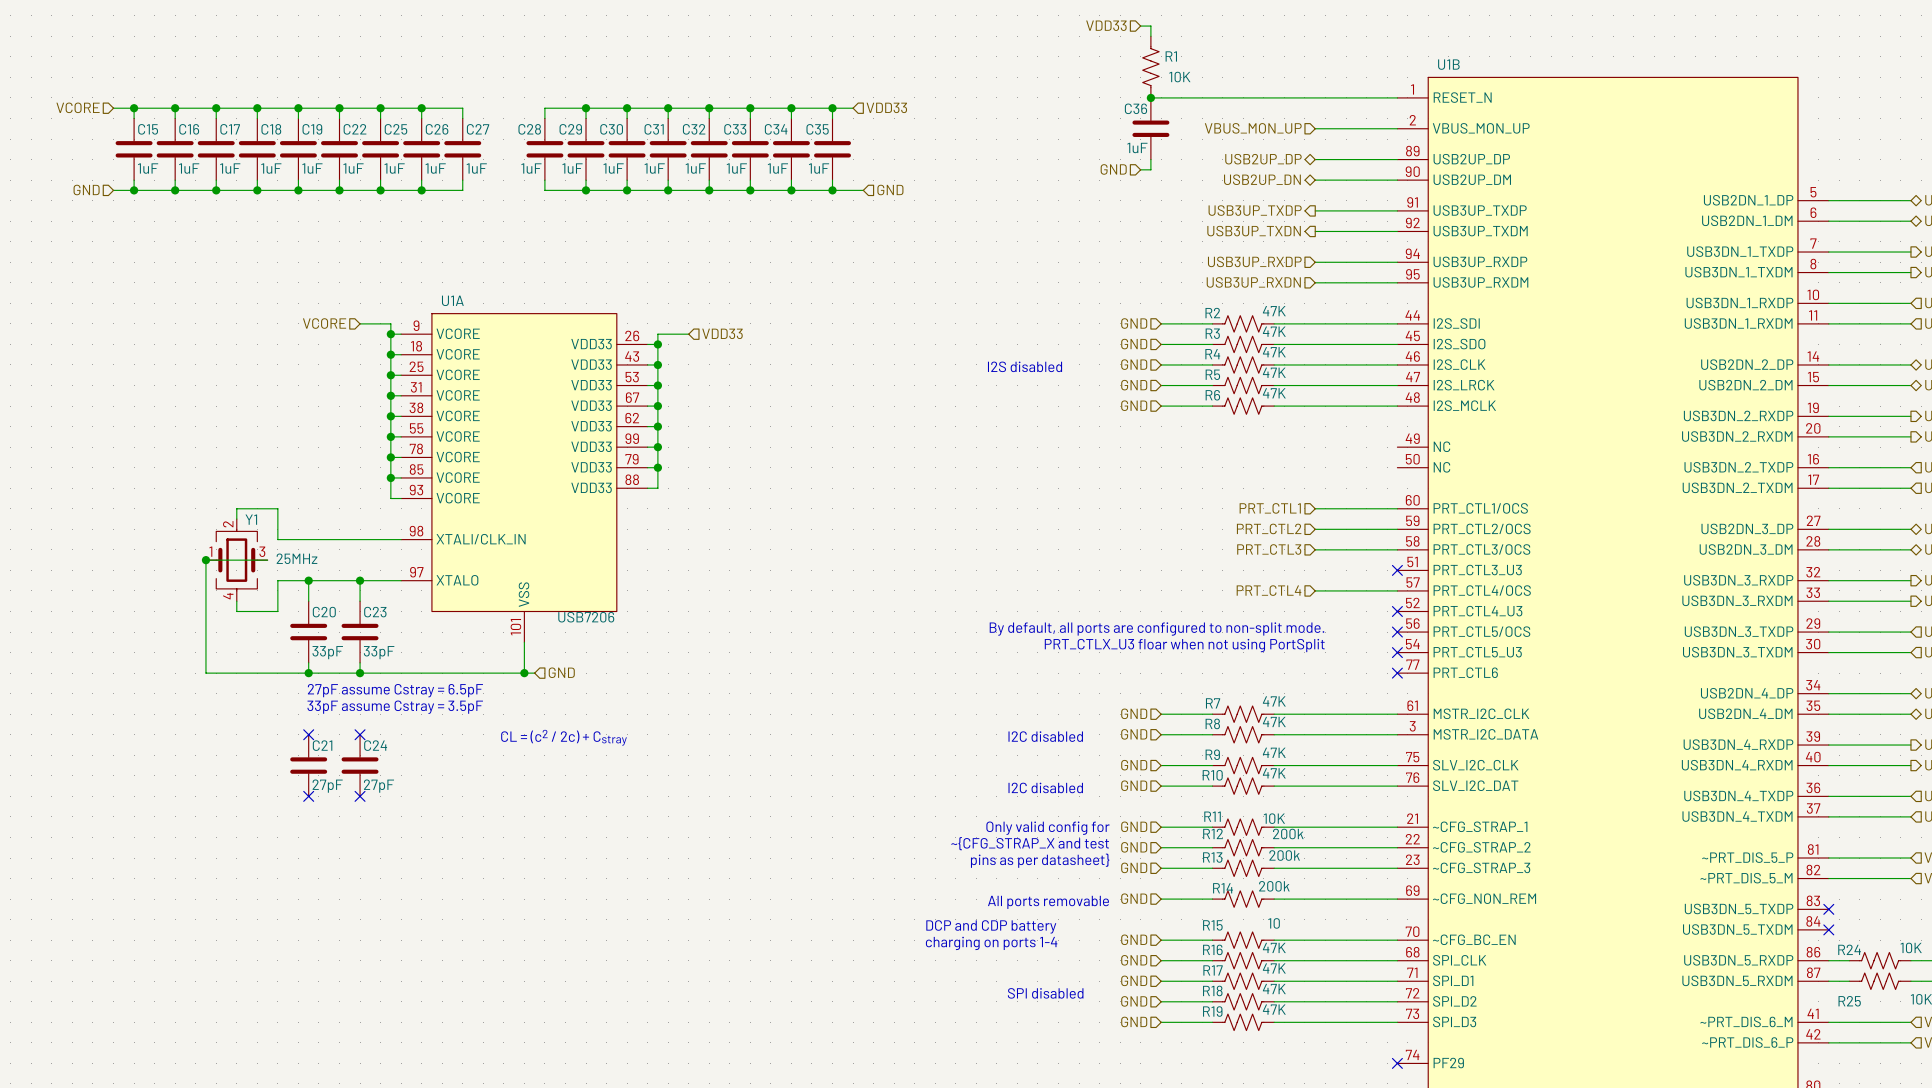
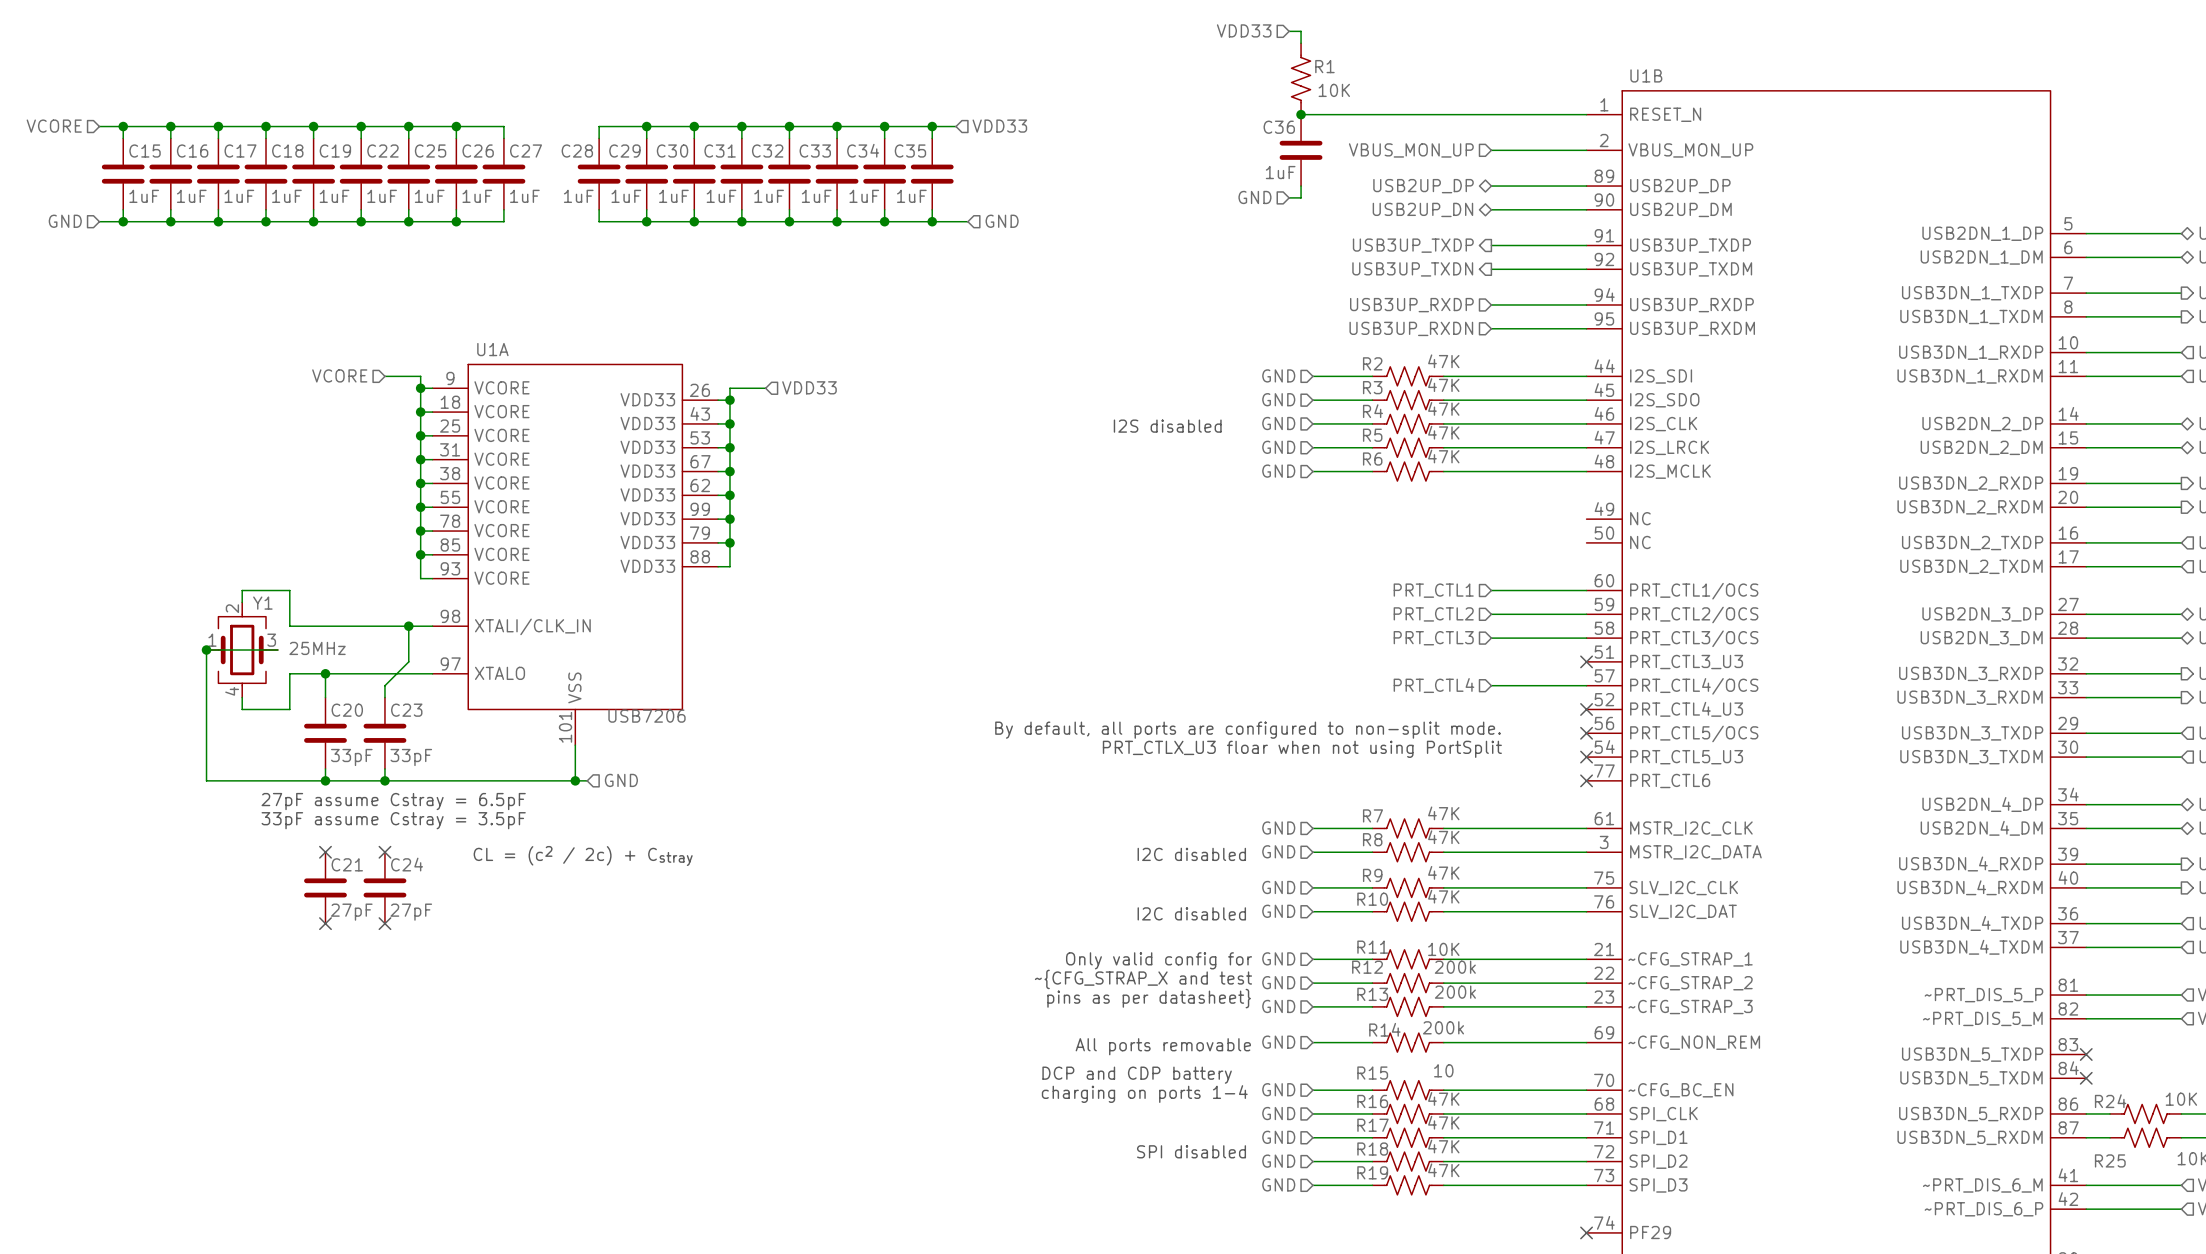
wire: (360, 580) (360, 590) -> (408, 626) (408, 661) (384, 685)
junction position: (360, 580) -> (408, 626)

